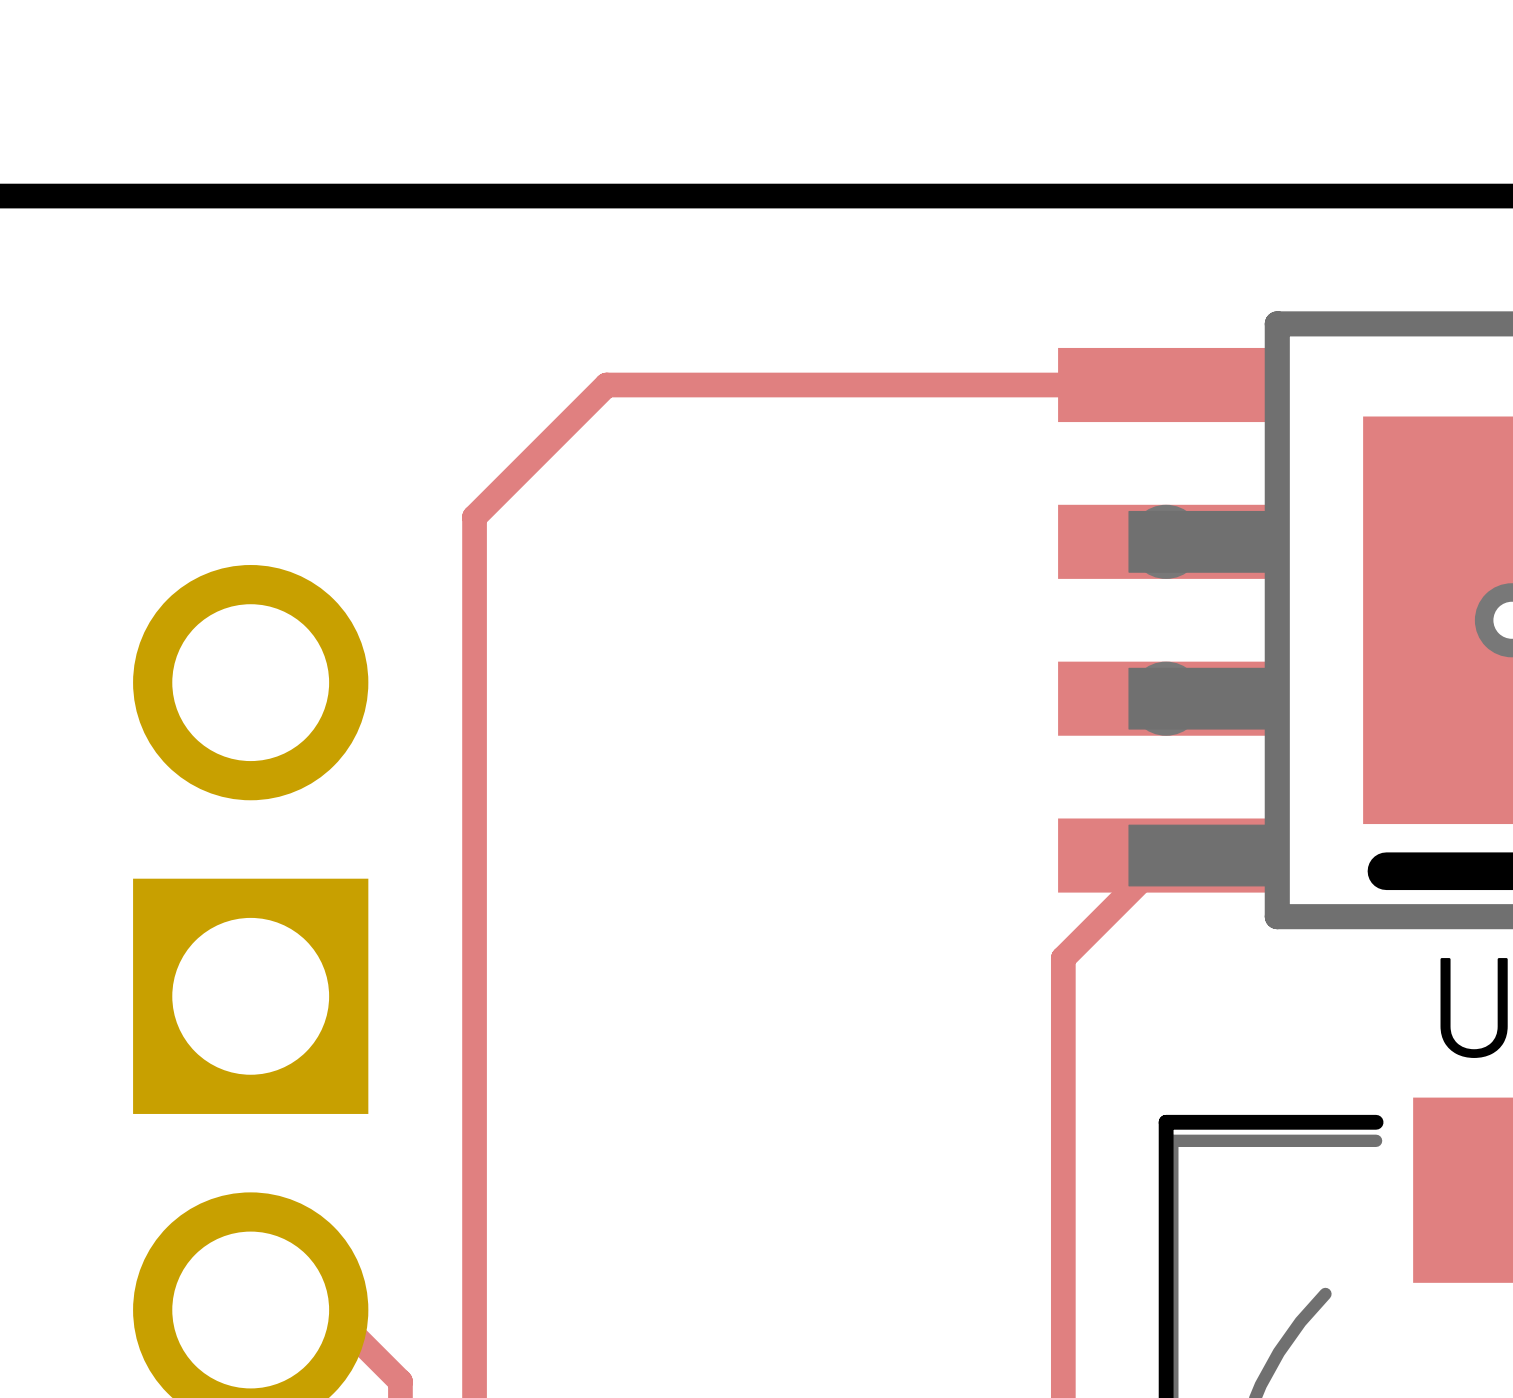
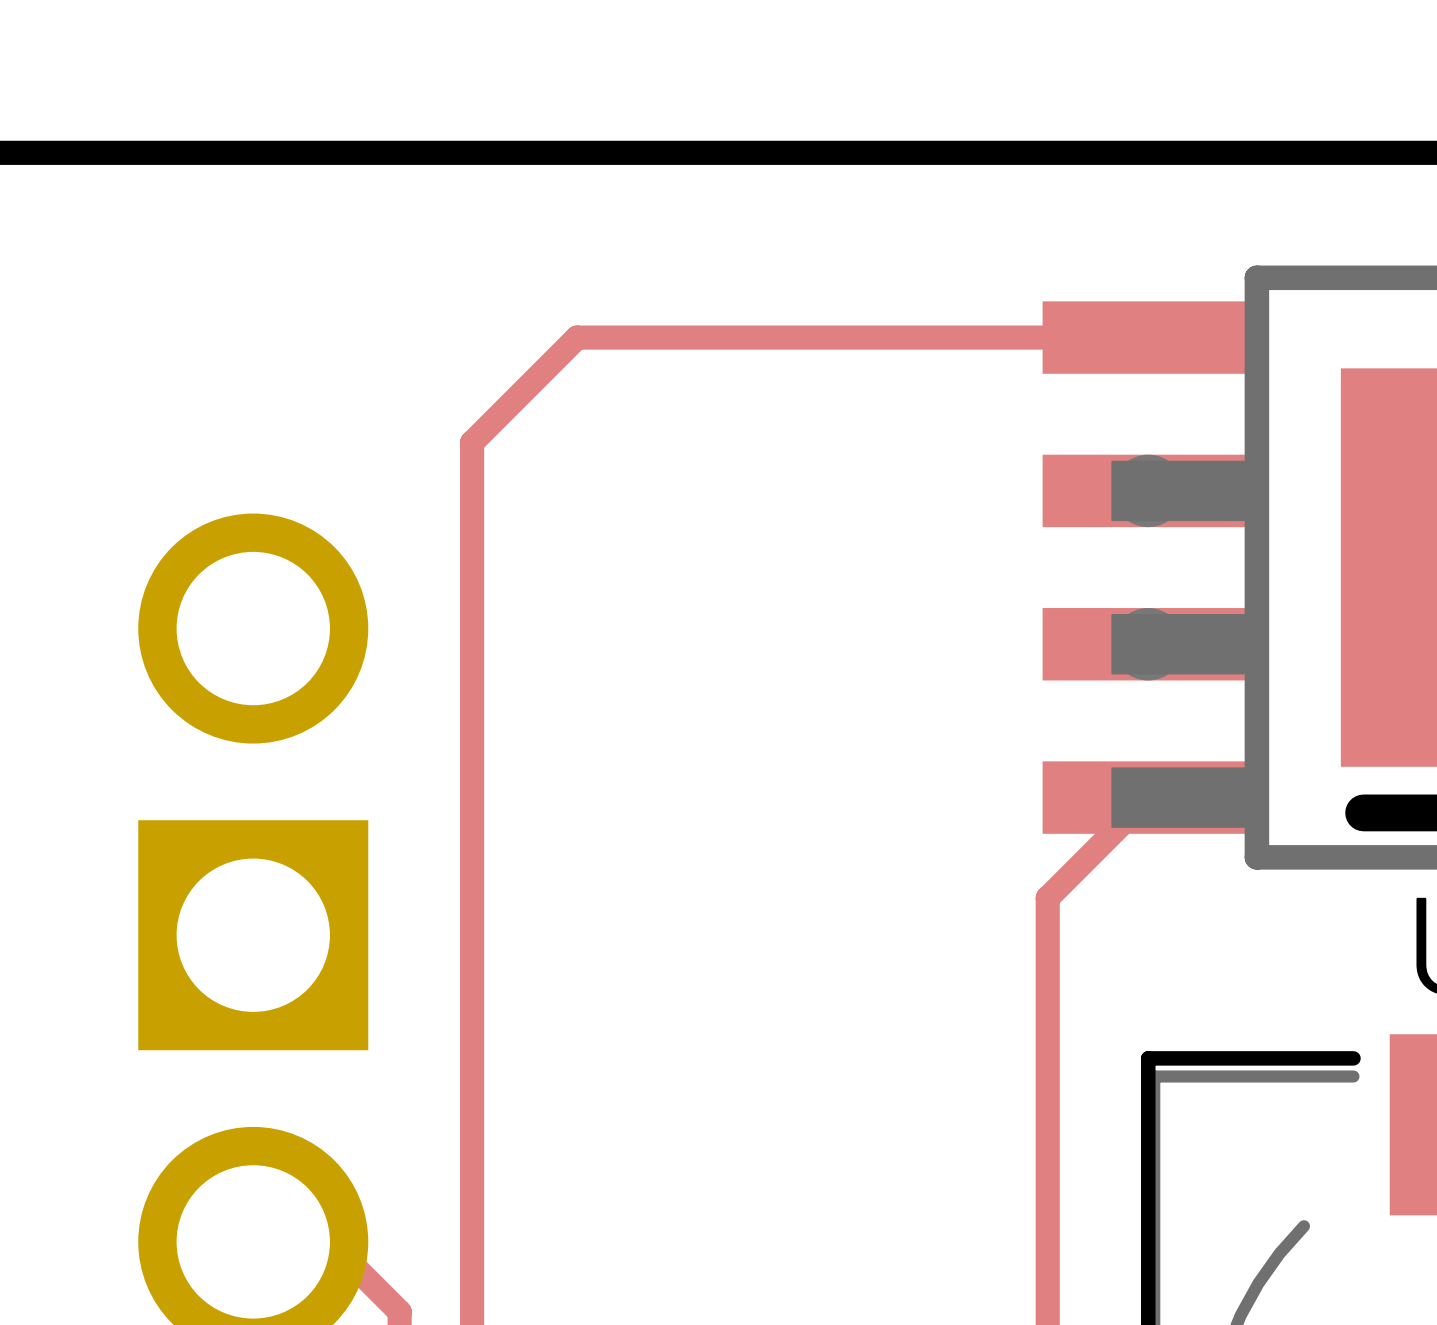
track: (606, 385) (474, 517) -> (601, 337) (577, 337) (472, 442) (472, 466)

